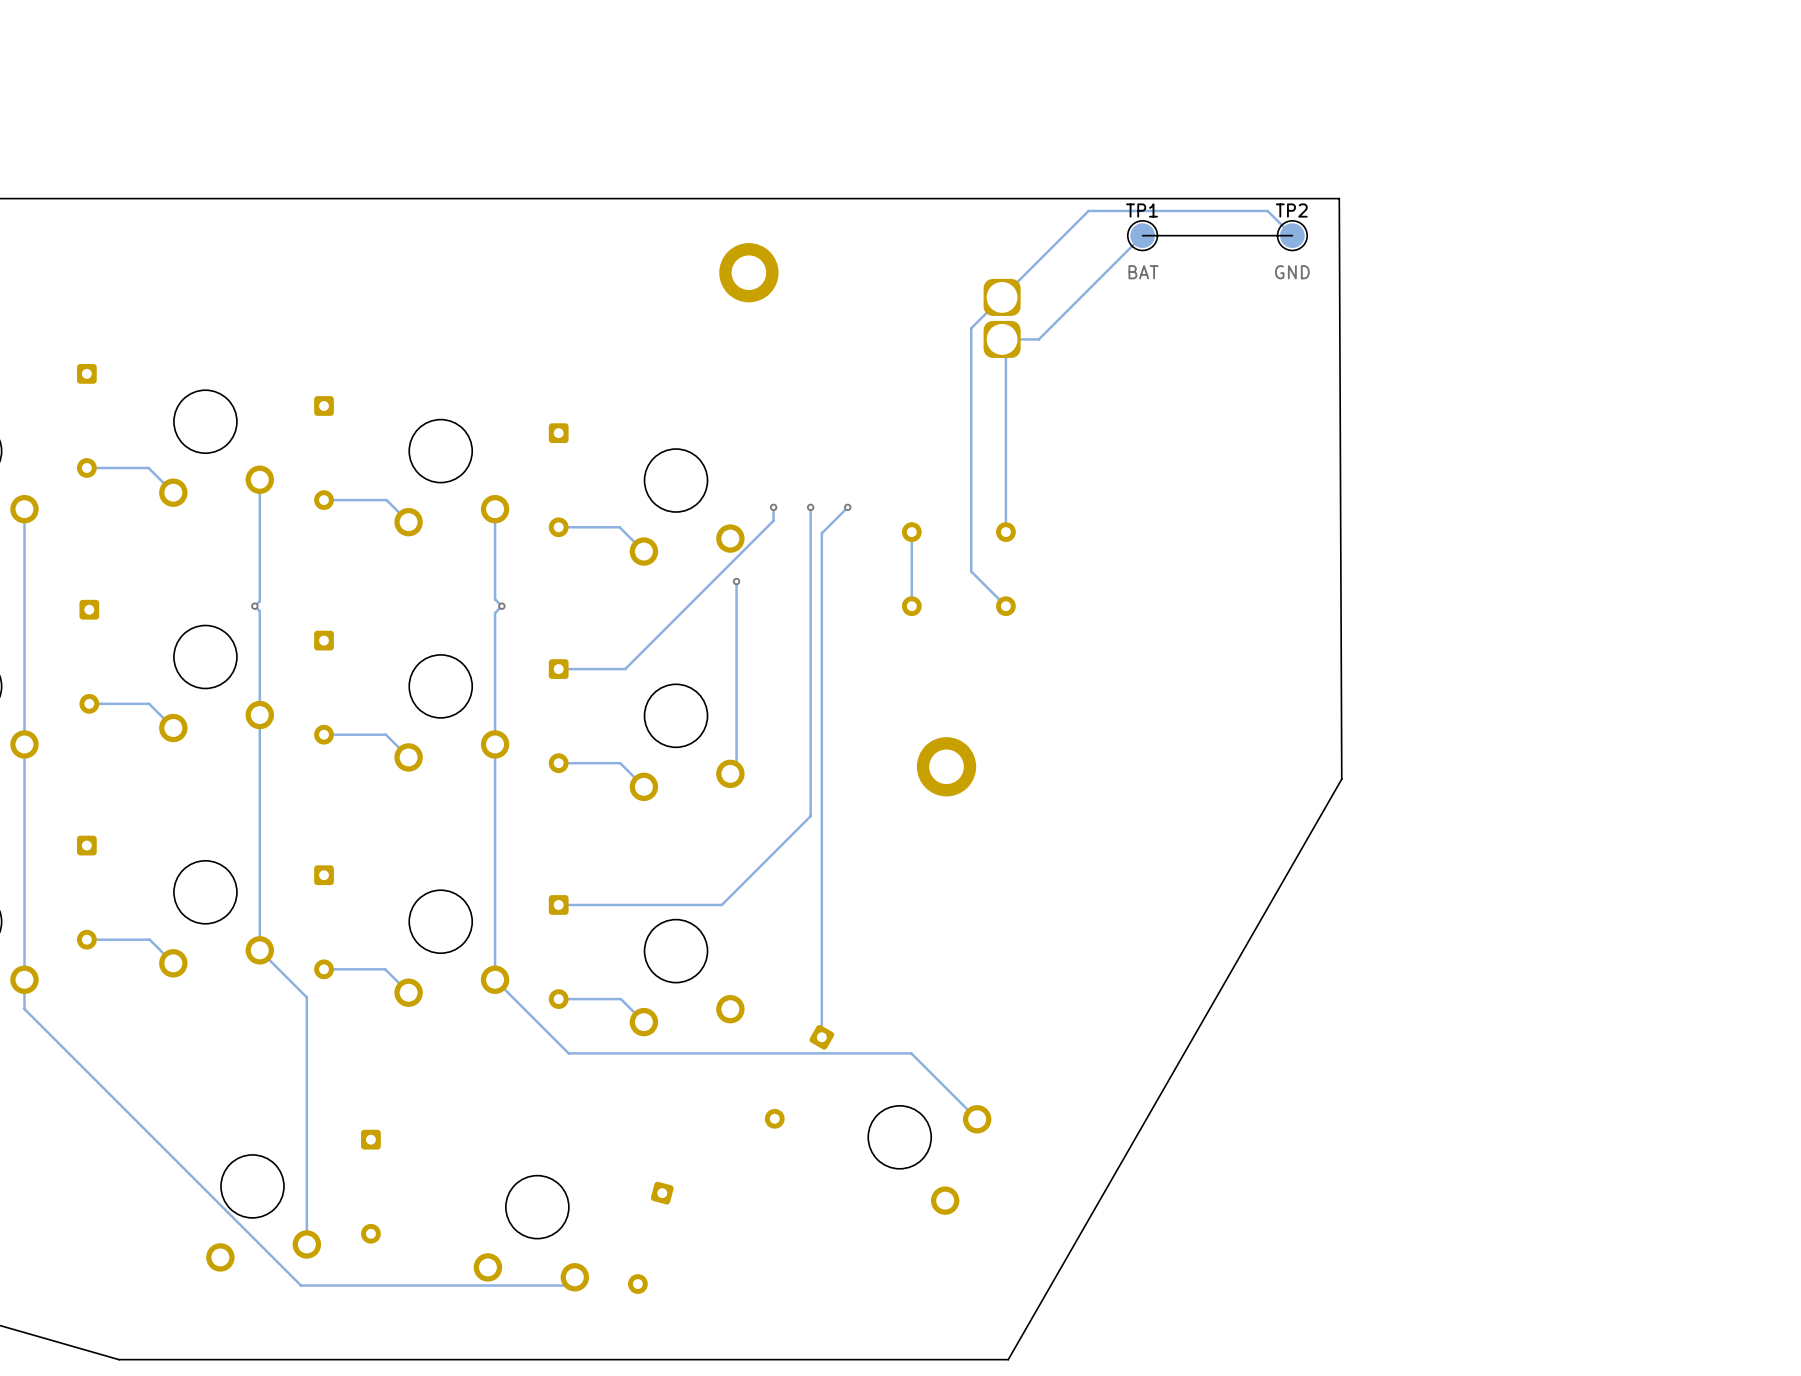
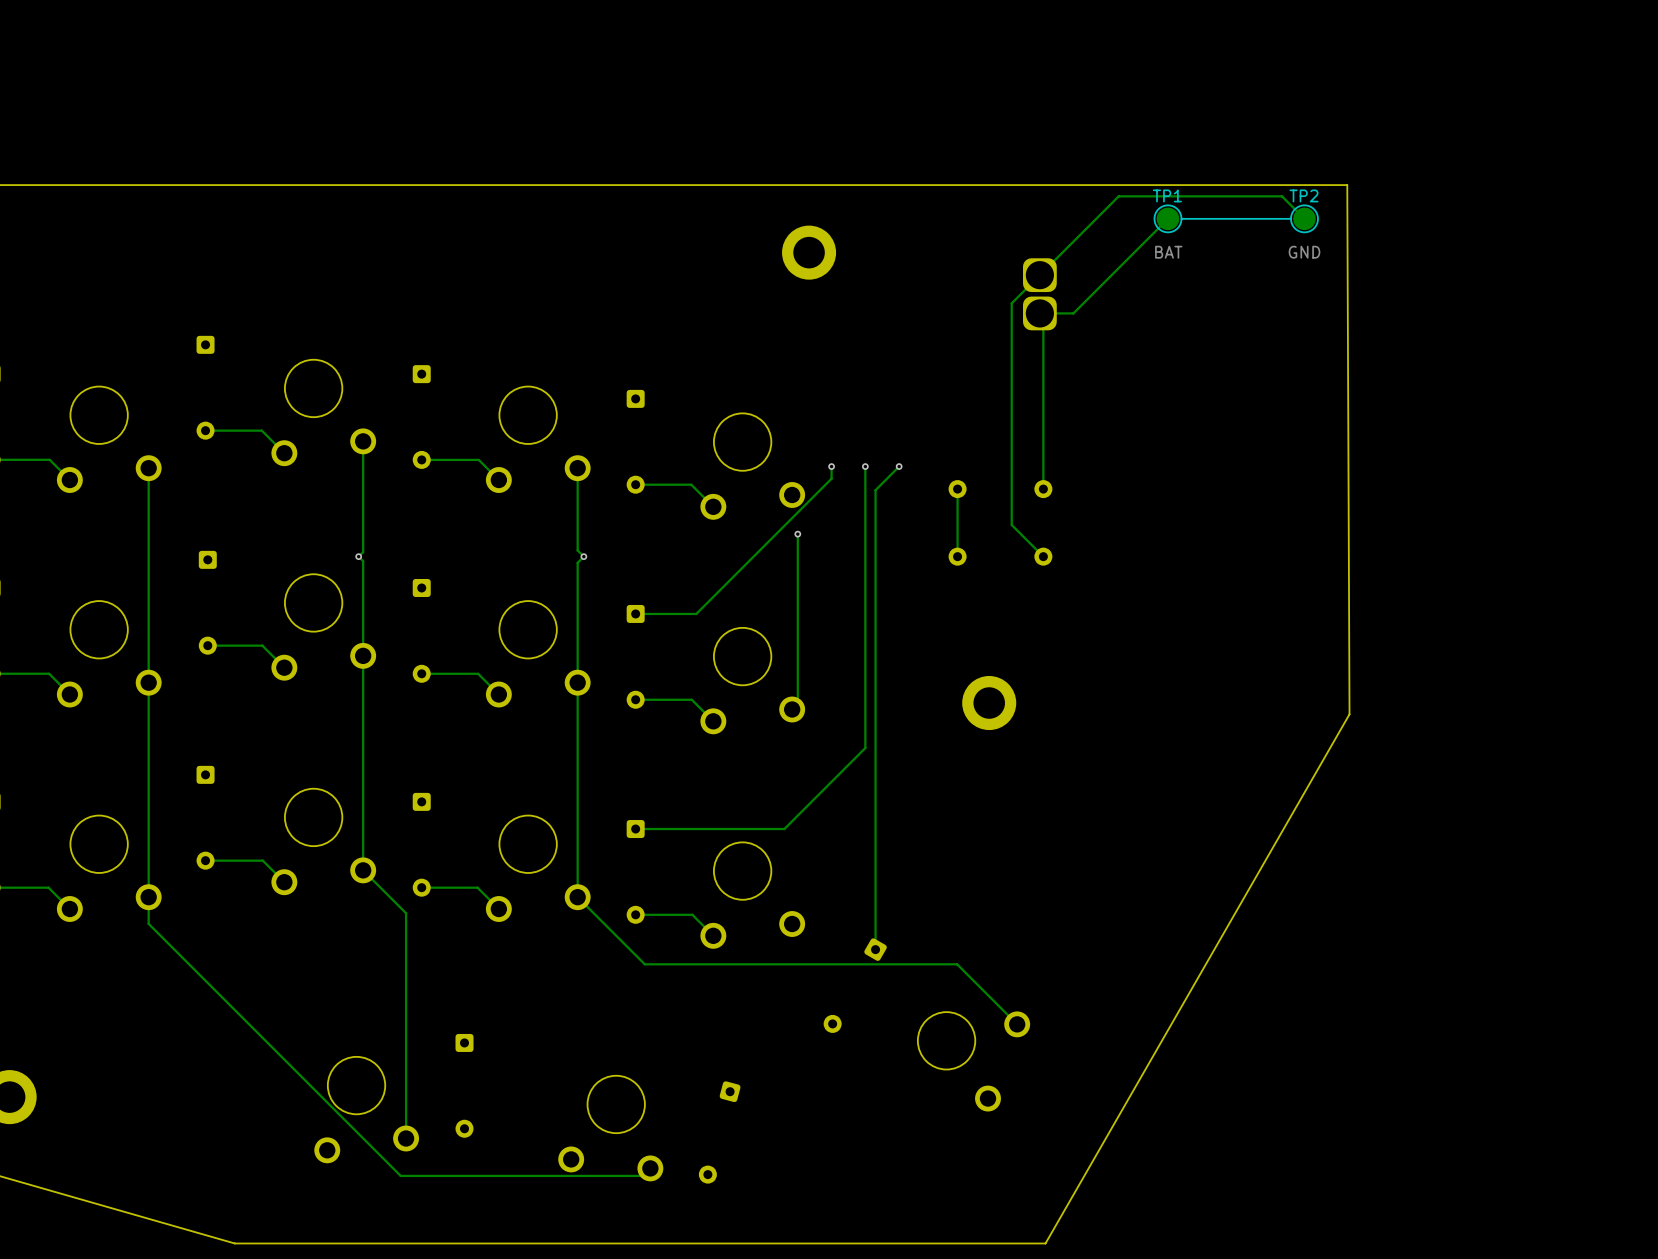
line: (1157, 235) (1142, 235) -> none
line: (1292, 235) (1277, 235) -> none

